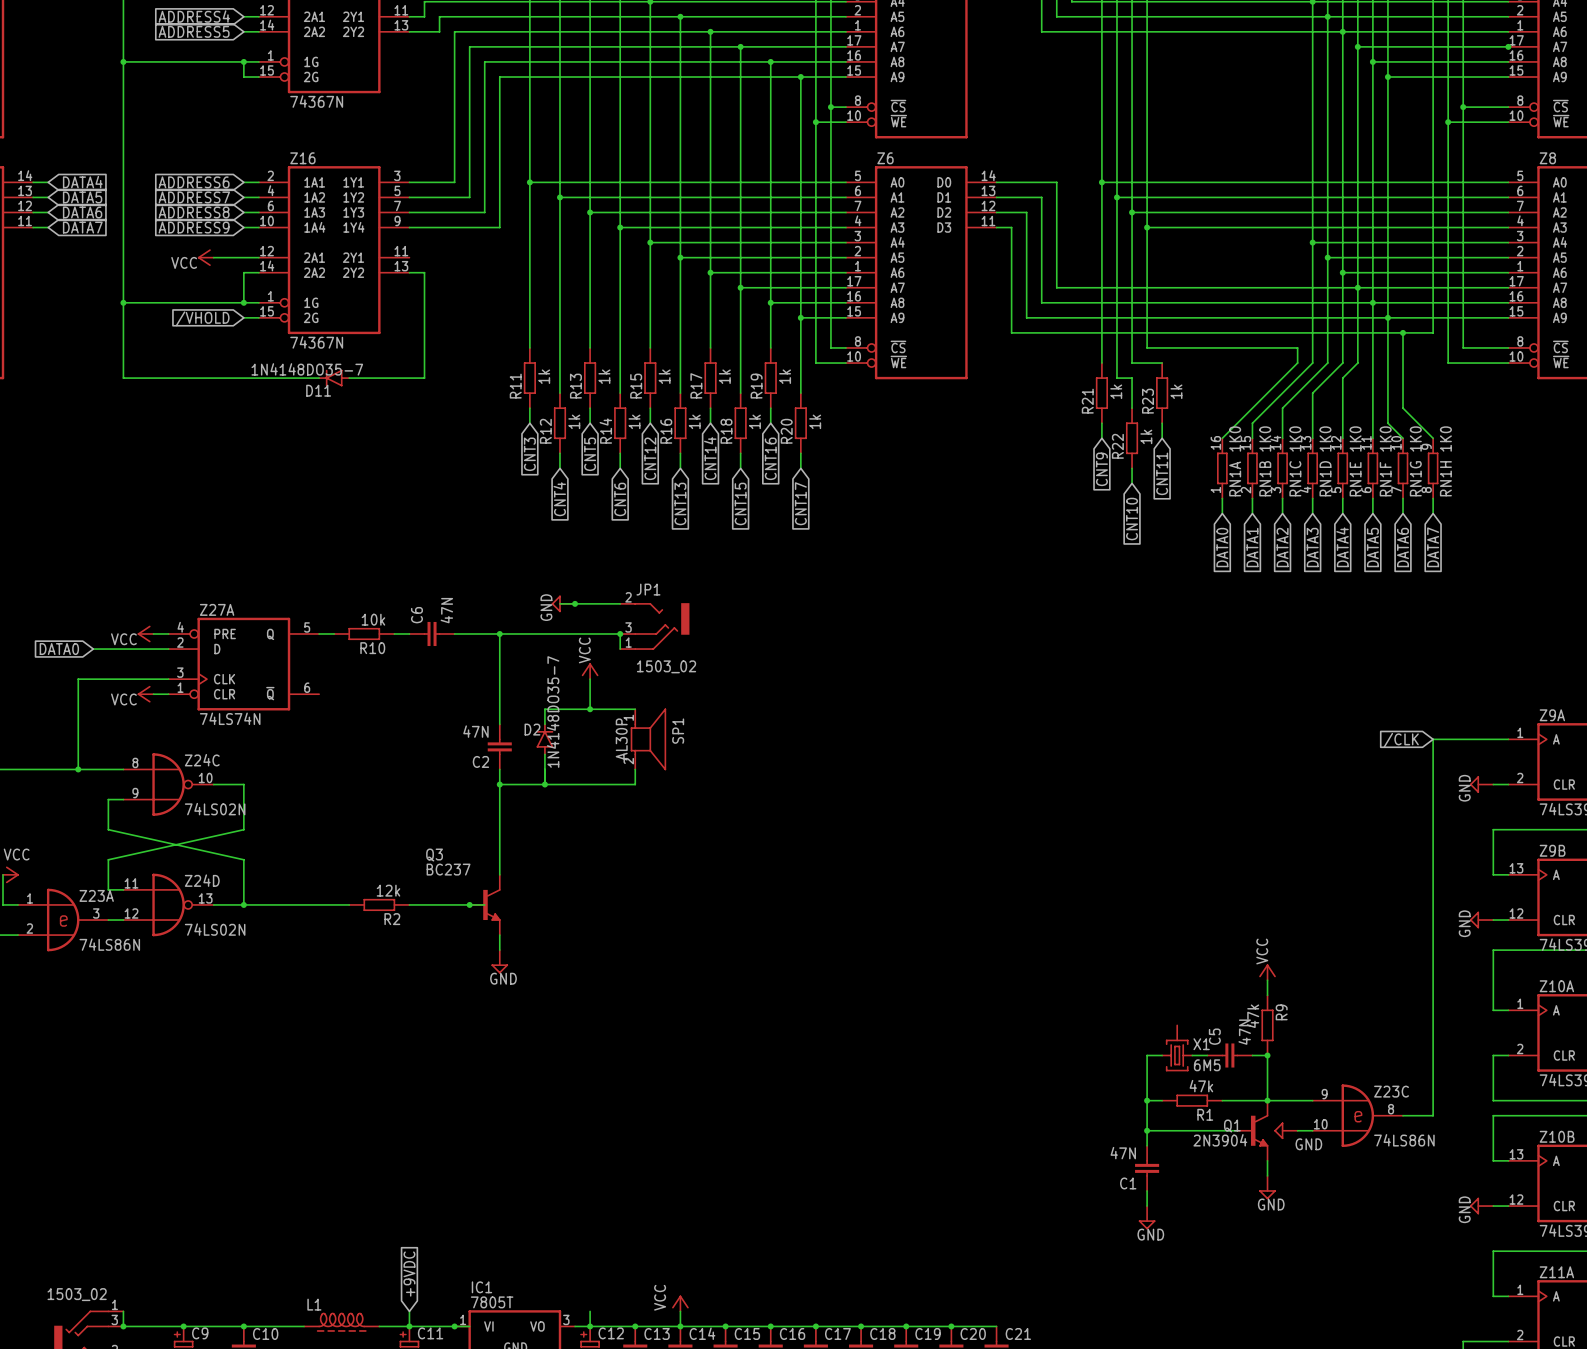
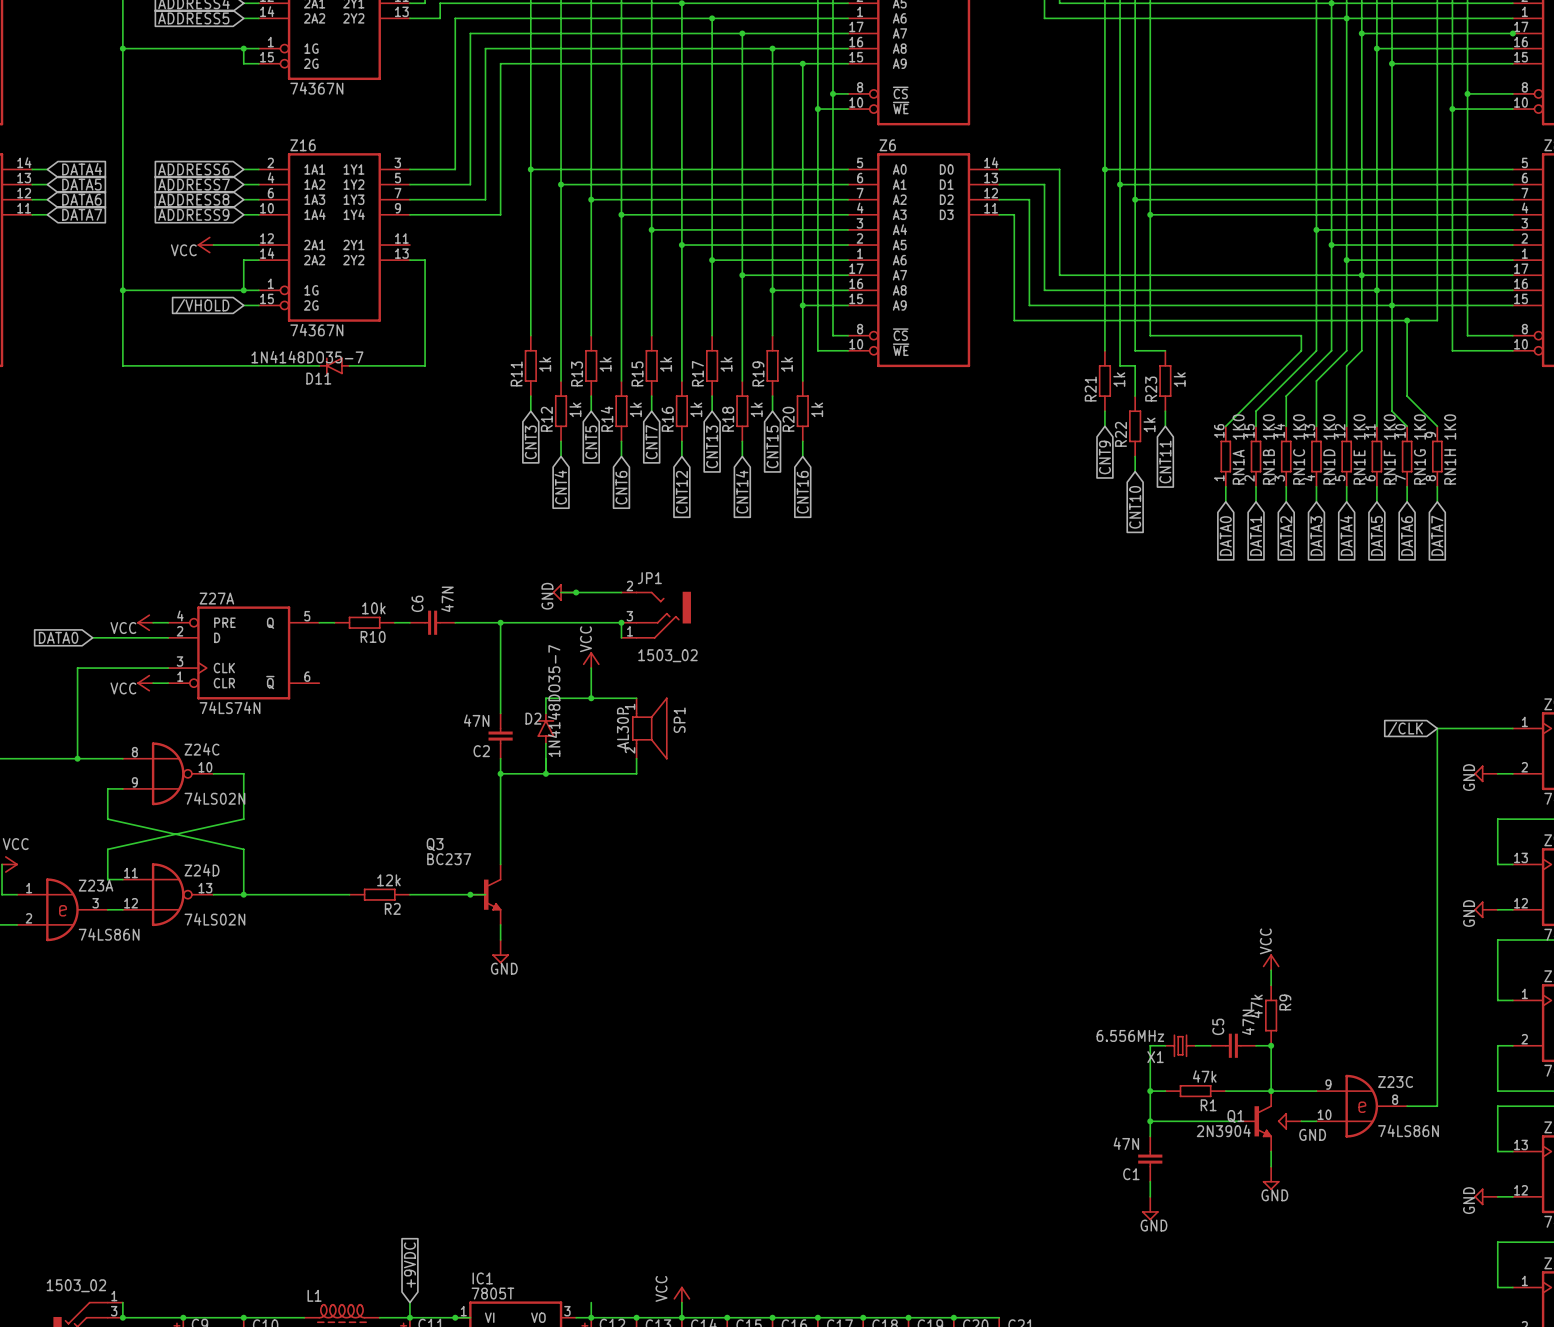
global label: CNT12 (650, 458) -> CNT7 (651, 442)
global label: CNT14 (710, 458) -> CNT13 (712, 446)
global label: CNT16 (770, 458) -> CNT15 (772, 446)
global label: CNT13 (680, 503) -> CNT12 (681, 492)
global label: CNT15 (740, 503) -> CNT14 (742, 491)
global label: CNT17 (800, 503) -> CNT16 (802, 492)
X1 symbol: [1161, 1025, 1193, 1072] -> [1164, 1034, 1197, 1058]
X1 name position: X1 (1201, 1044) -> X1 (1155, 1057)
X1 value: 6M5 (1207, 1065) -> 6.556MHz (1130, 1035)

